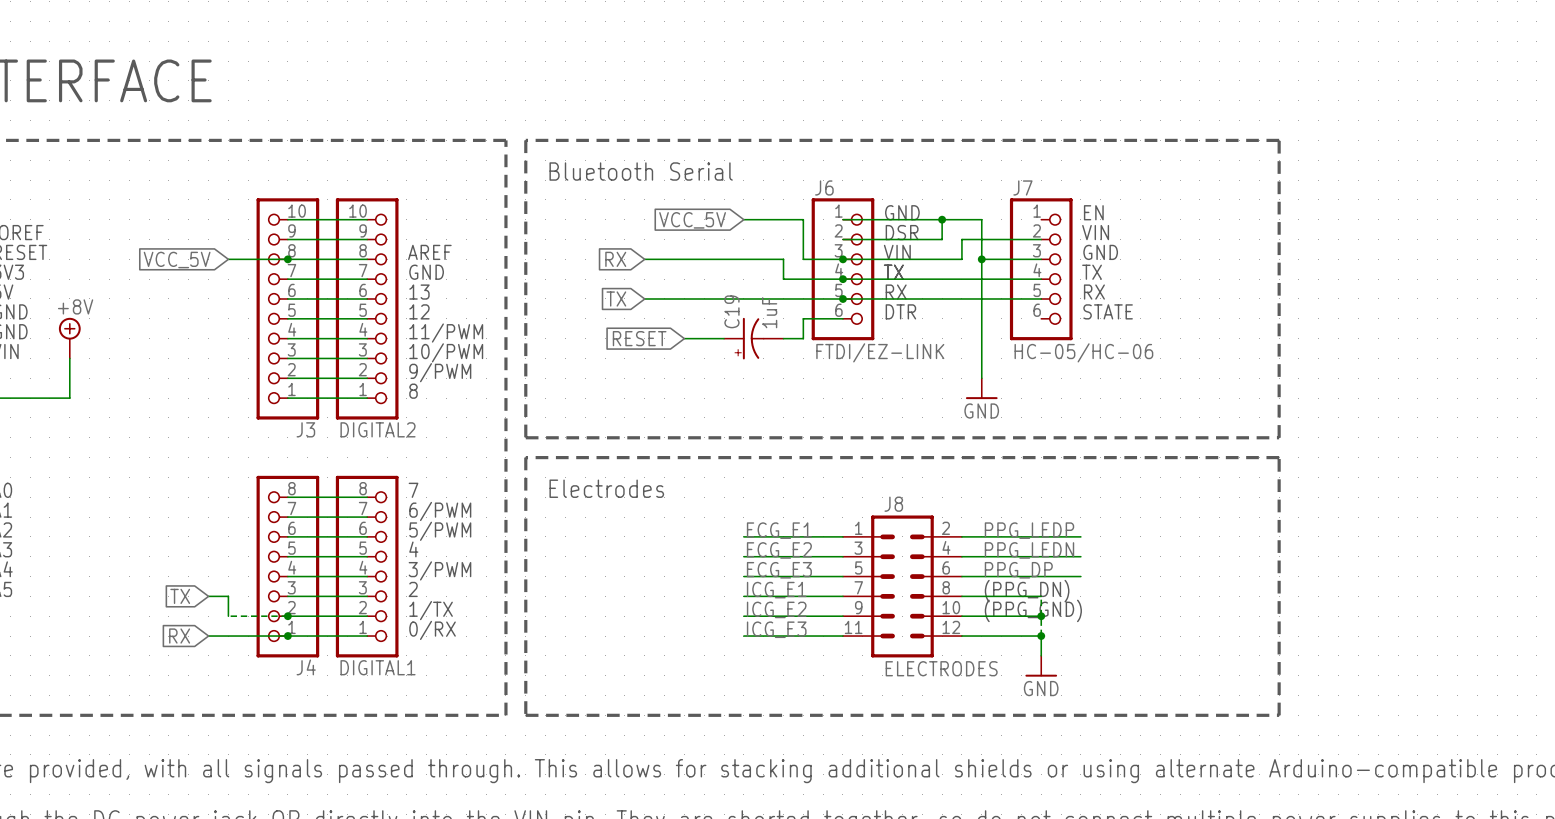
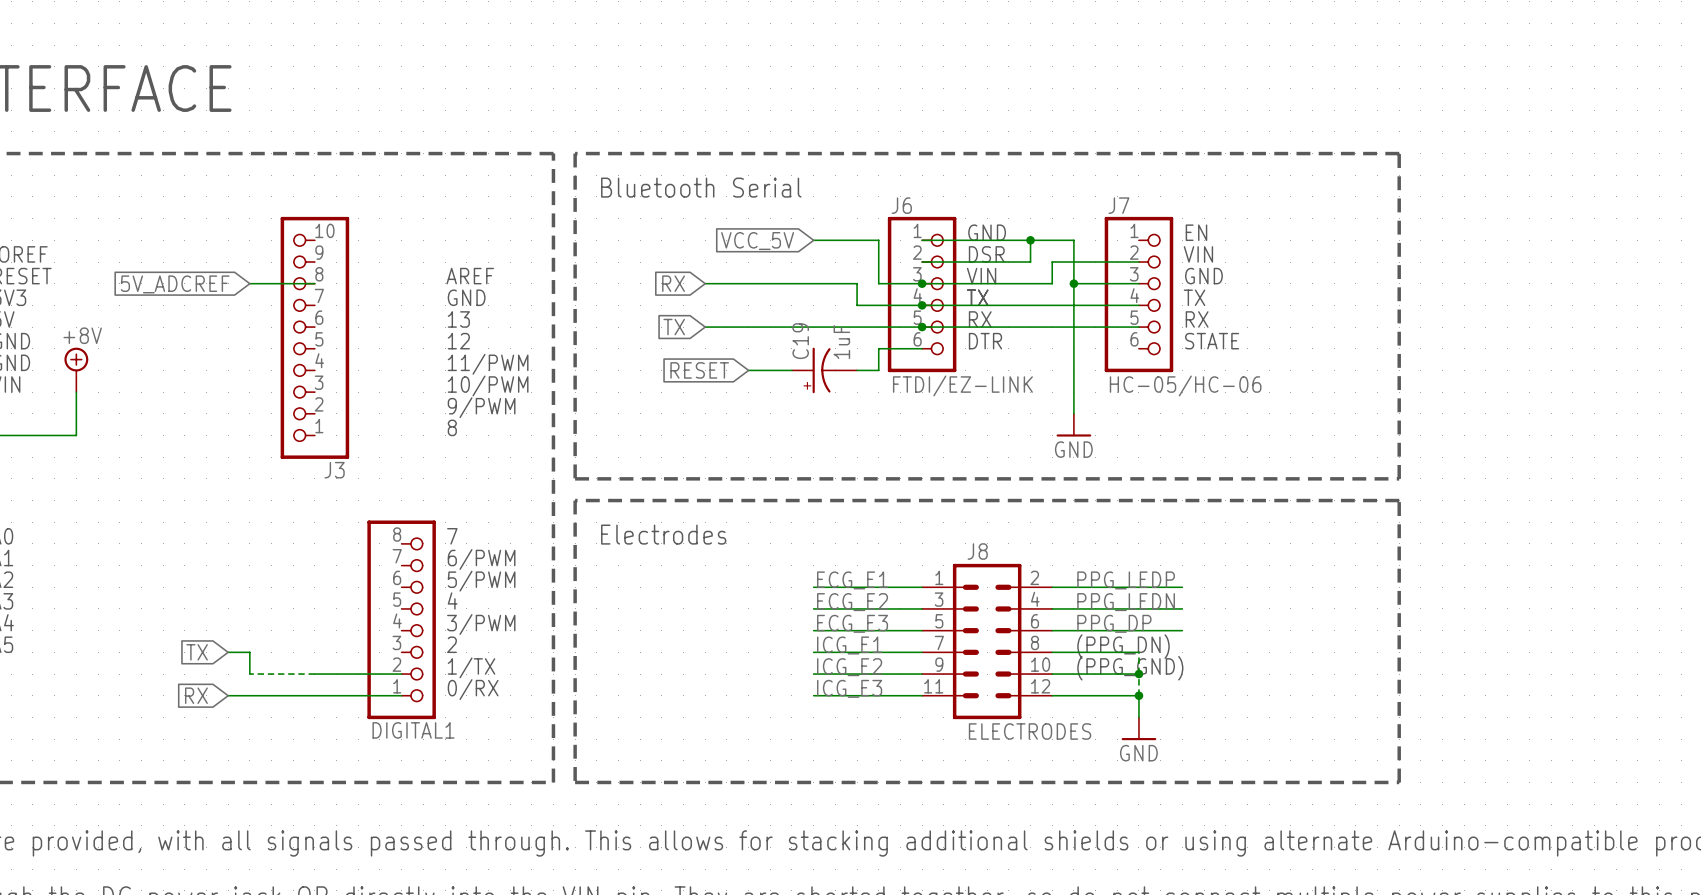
wire: (287, 219) (367, 219) -> none
wire: (287, 239) (367, 239) -> none
wire: (287, 259) (367, 259) -> none
junction: (287, 259) -> none
global label: VCC_5V (177, 260) -> 5V_ADCREF (175, 284)
wire: (287, 279) (367, 279) -> none
wire: (287, 298) (367, 298) -> none
DIGITAL2: (367, 308) -> none
wire: (287, 318) (367, 318) -> none
wire: (287, 338) (367, 338) -> none
wire: (287, 358) (367, 358) -> none
wire: (287, 378) (367, 378) -> none
wire: (287, 398) (367, 398) -> none
wire: (287, 497) (367, 497) -> none
wire: (287, 517) (367, 517) -> none
wire: (287, 536) (367, 536) -> none
wire: (287, 556) (367, 556) -> none
J4: (287, 566) -> none
wire: (287, 576) (367, 576) -> none
wire: (287, 596) (367, 596) -> none
junction: (287, 616) -> none
junction: (287, 636) -> none

